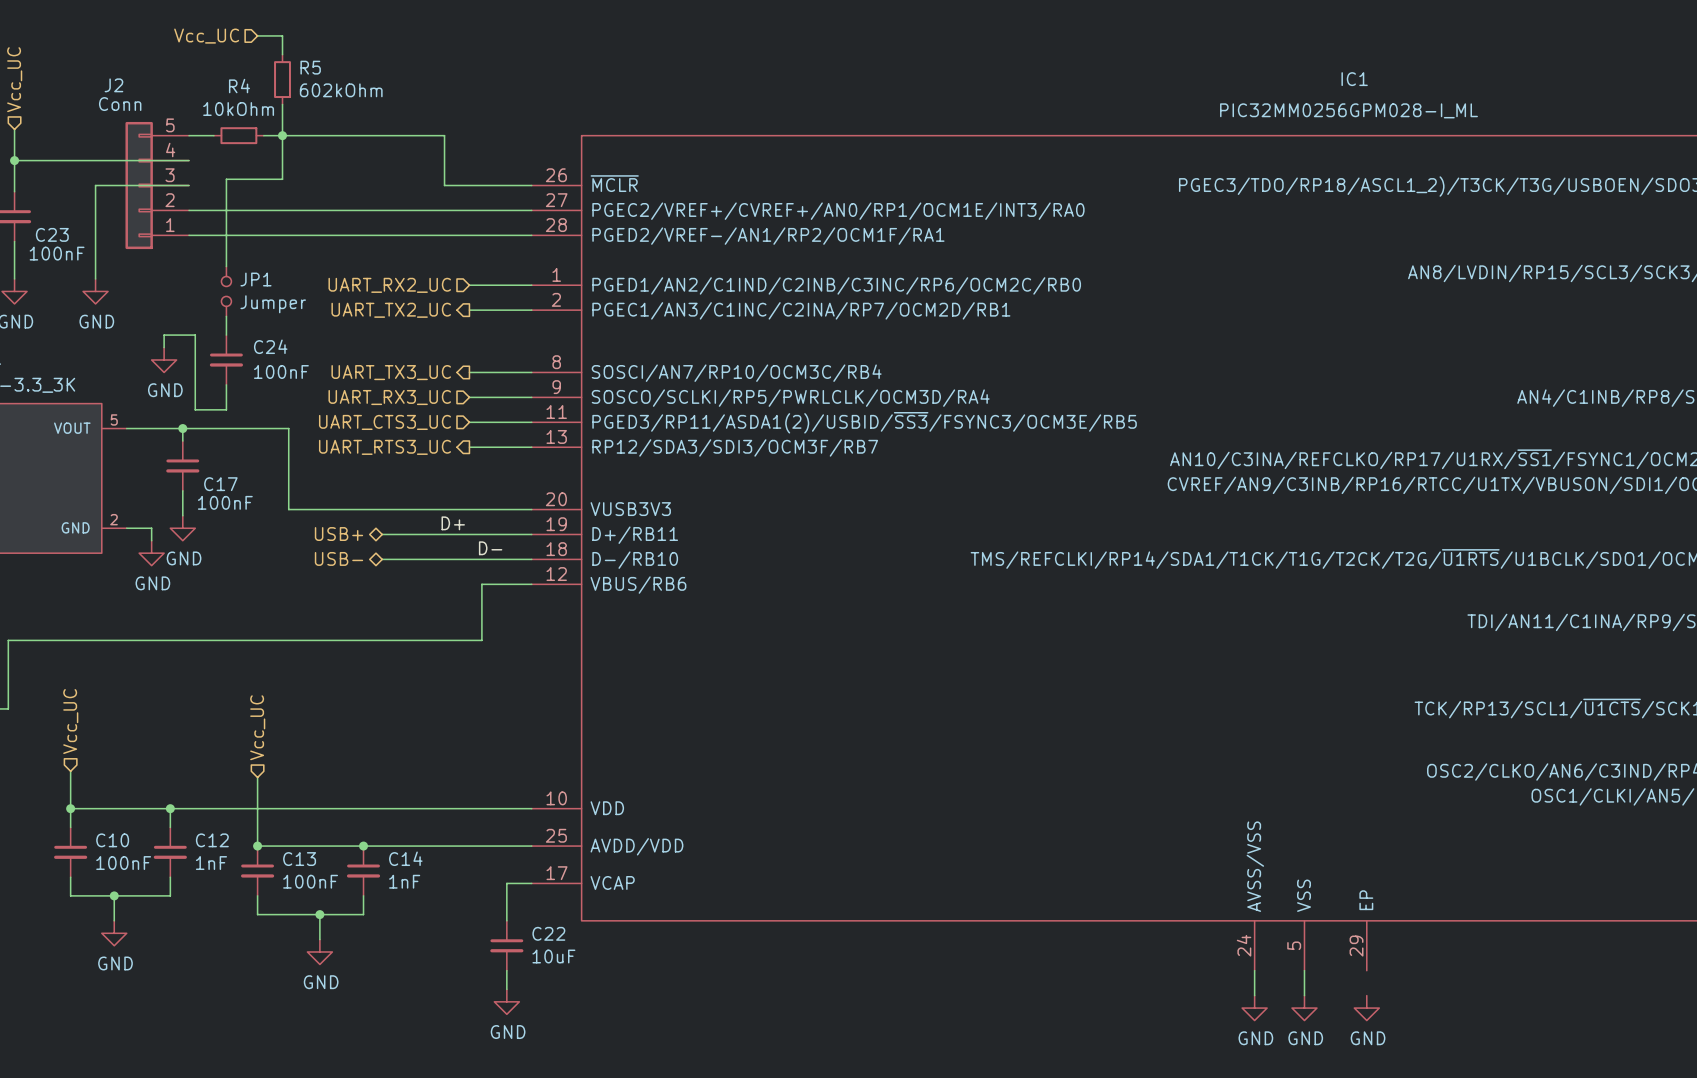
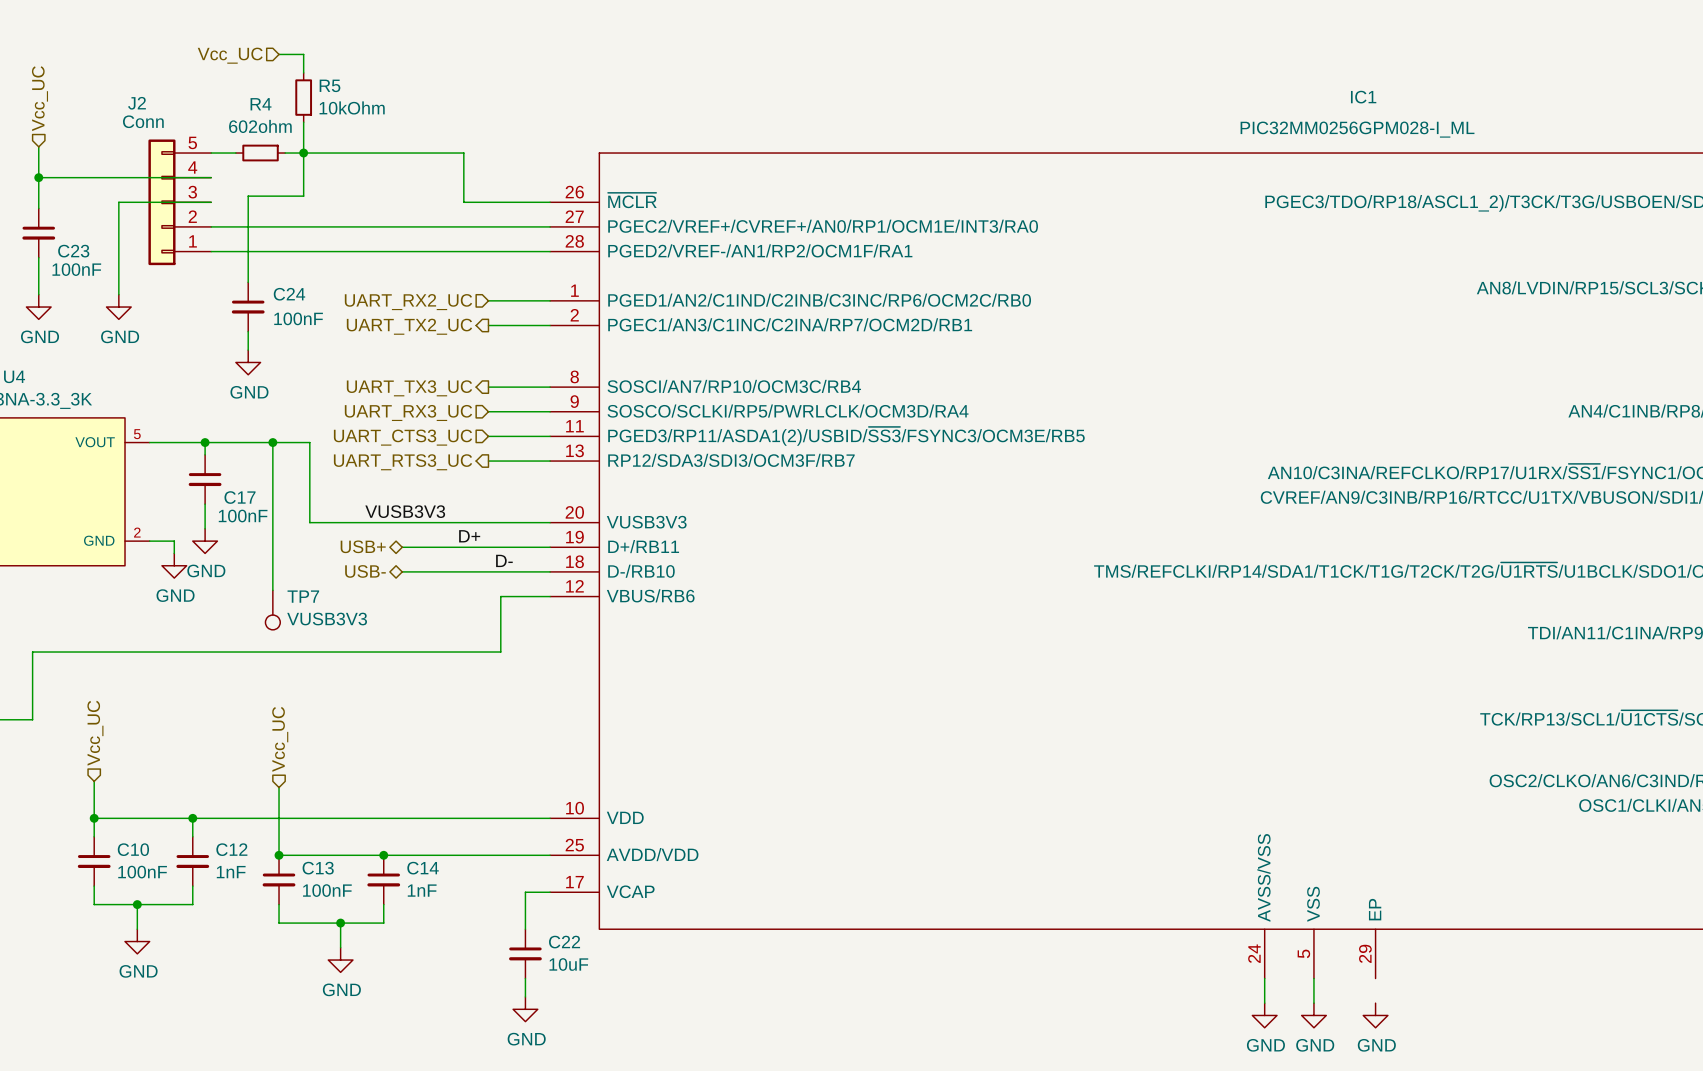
R5 value: 602kOhm (341, 90) -> 10kOhm (352, 107)
R4 value: 10kOhm (238, 109) -> 602ohm (260, 126)
JP1: Jumper (226, 291) -> none
wire: (164, 347) (164, 335) (195, 335) (195, 409) (226, 409) (226, 384) -> none
power symbol position: GND (164, 359) -> GND (248, 362)
C24 position: (226, 359) -> (248, 307)
wire: none -> (272, 442) (272, 590)
junction: none -> (272, 442)
label: none -> VUSB3V3 (405, 511)
TP7: none -> VUSB3V3 (272, 610)

